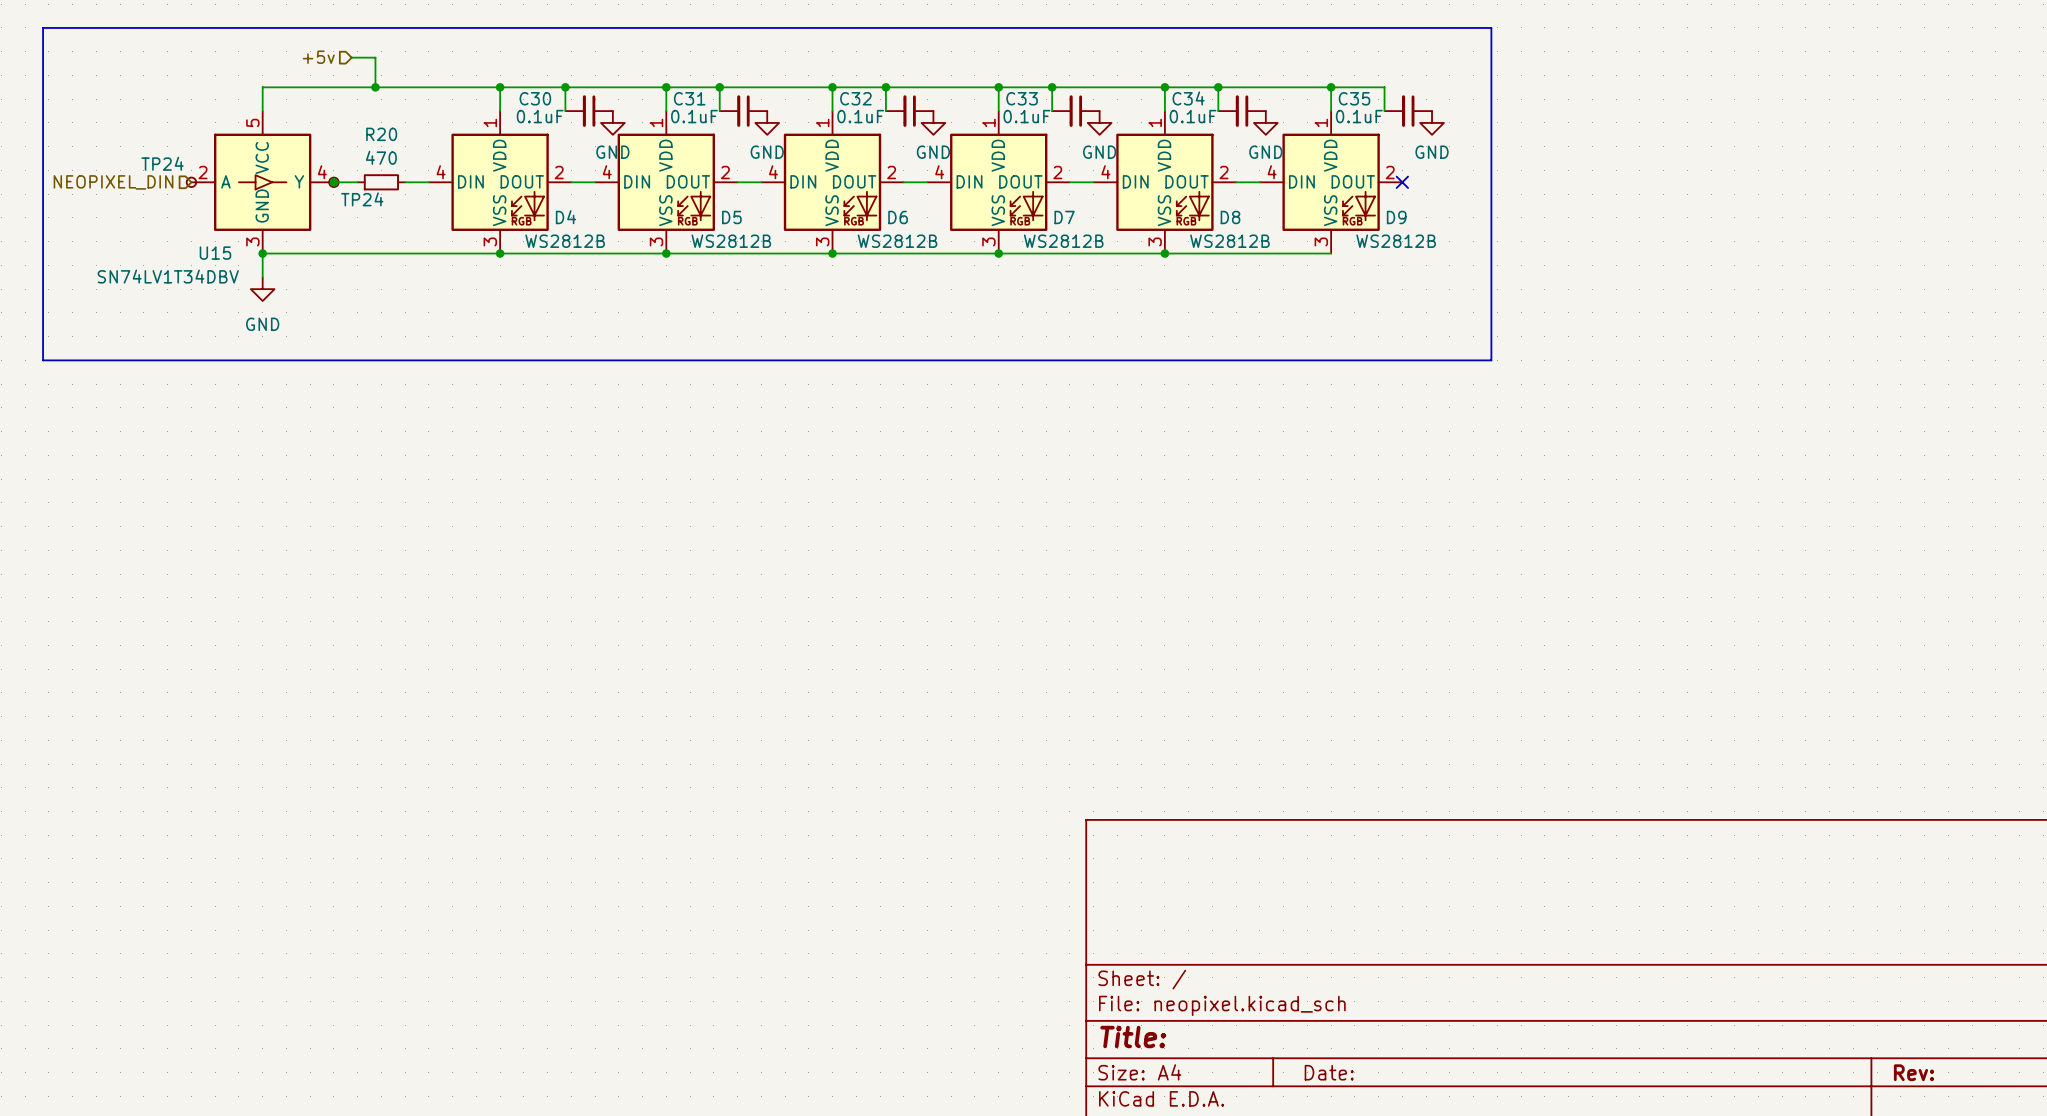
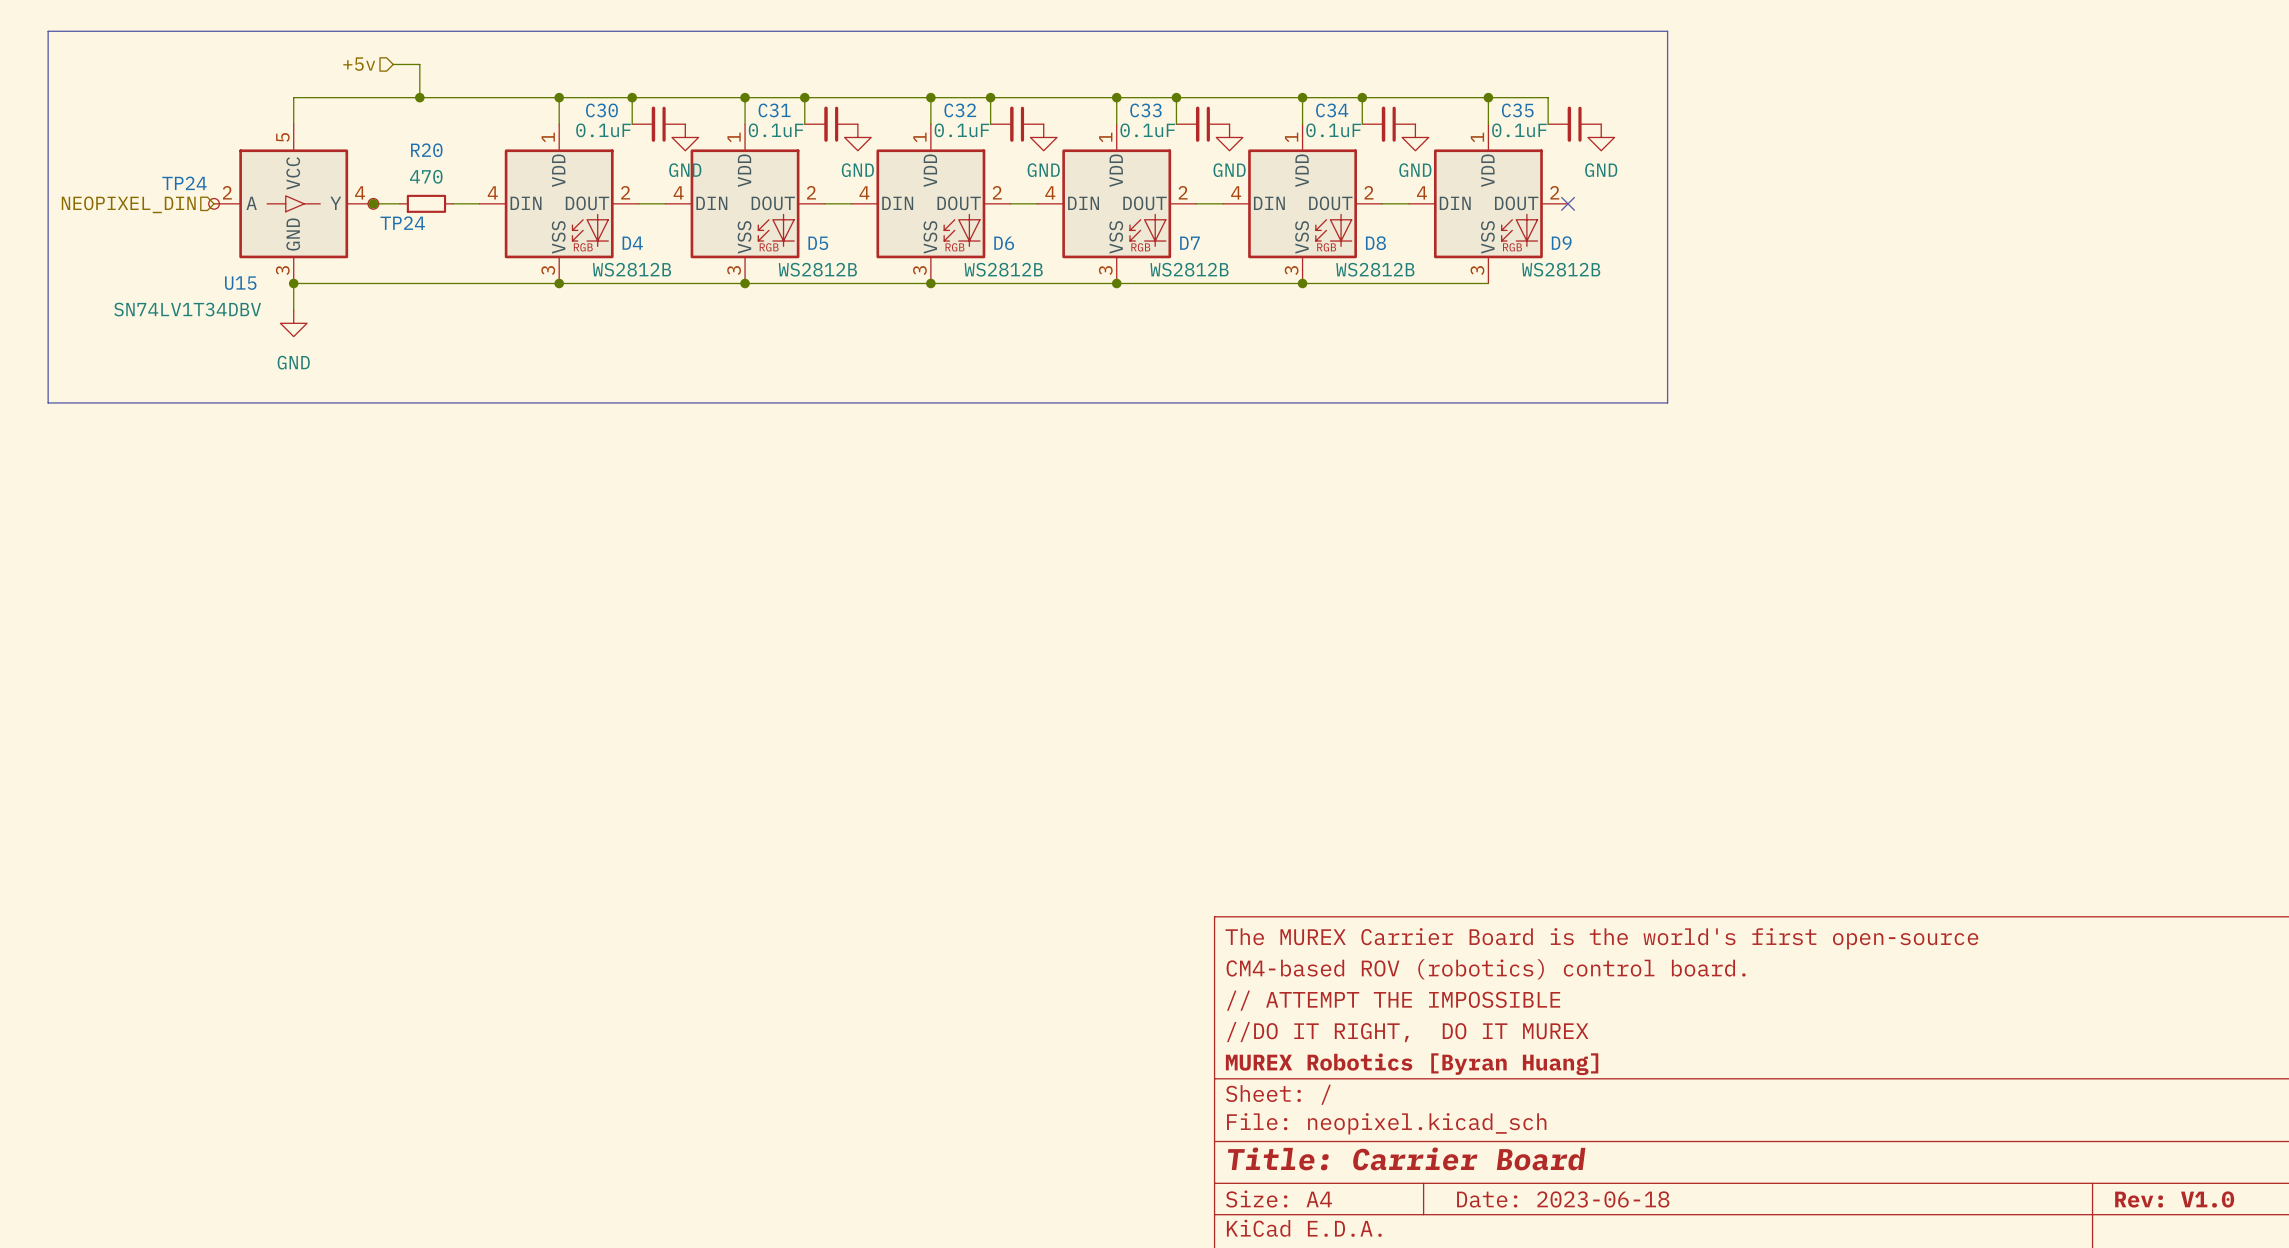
title block: none -> The MUREX Carrier Board is the world's first open-source (1601, 938)
title block: none -> CM4-based ROV (robotics) control board. (1486, 969)
title block: none -> // ATTEMPT THE IMPOSSIBLE (1393, 1000)
title block: none -> //DO IT RIGHT, DO IT MUREX (1407, 1032)
title block: none -> MUREX Robotics [Byran Huang] (1412, 1064)
title block: Title: (1133, 1037) -> Title: Carrier Board (1406, 1158)
title block: Date: (1329, 1072) -> Date: 2023-06-18 (1563, 1199)
title block: Rev: (1913, 1072) -> Rev: V1.0 (2174, 1199)

